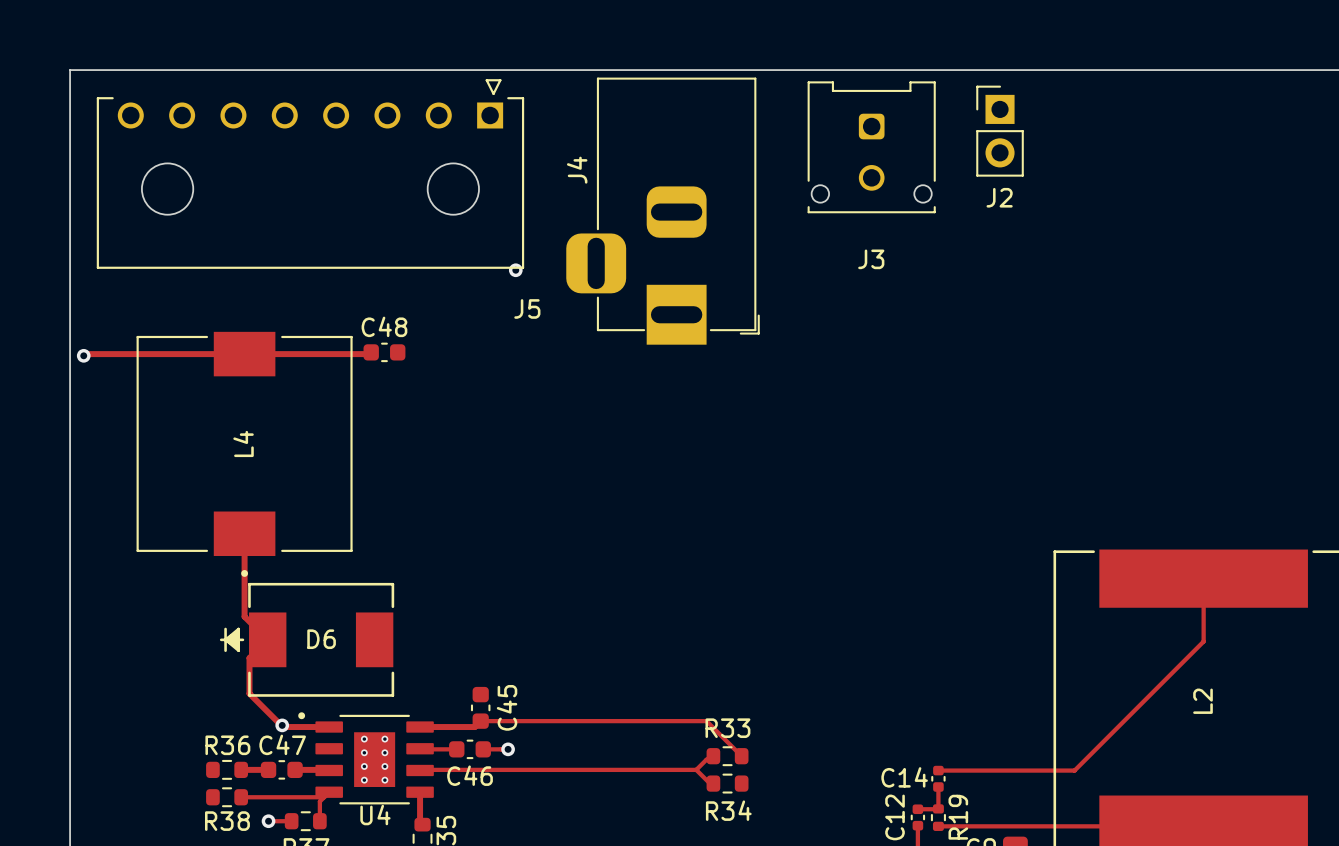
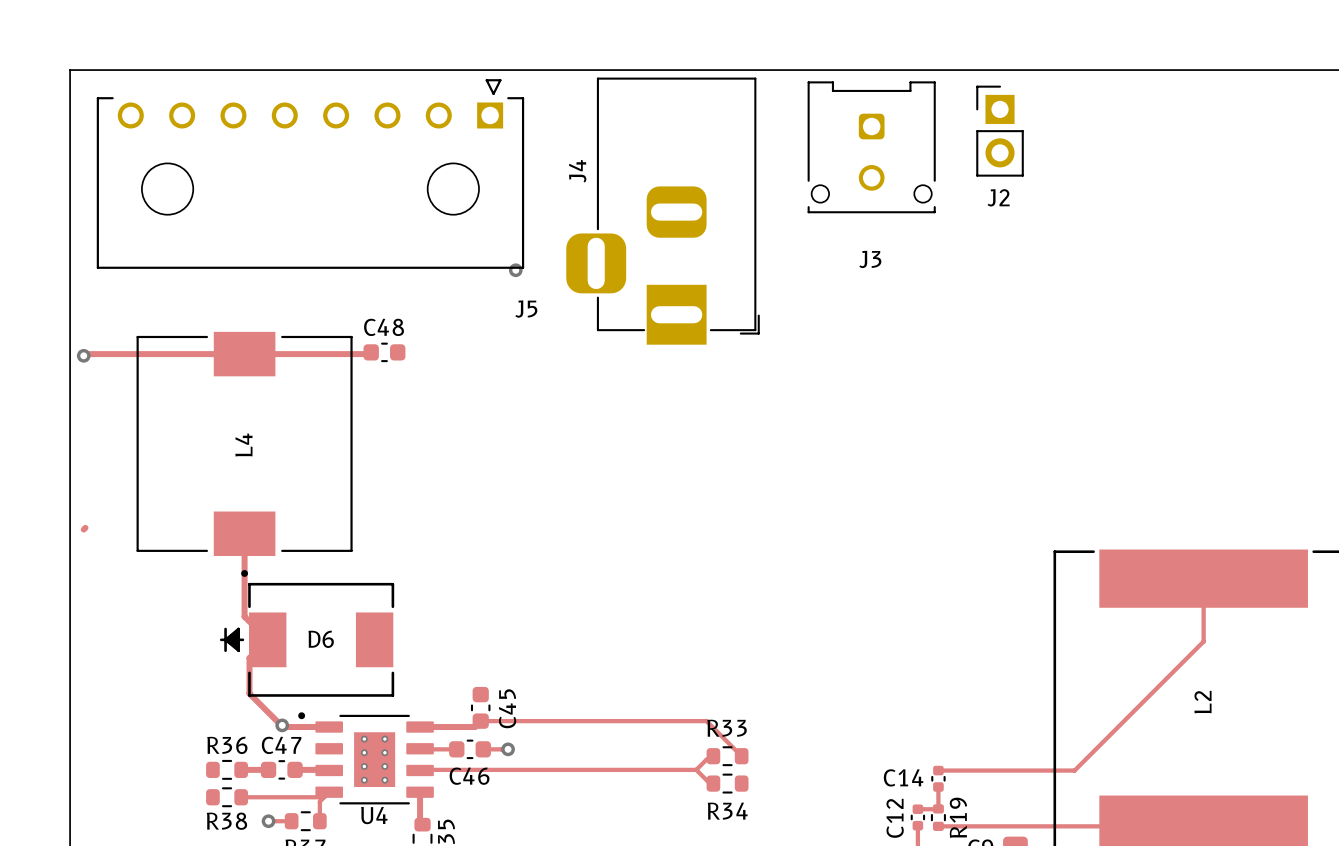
track: none -> (85, 527) (83, 529)

